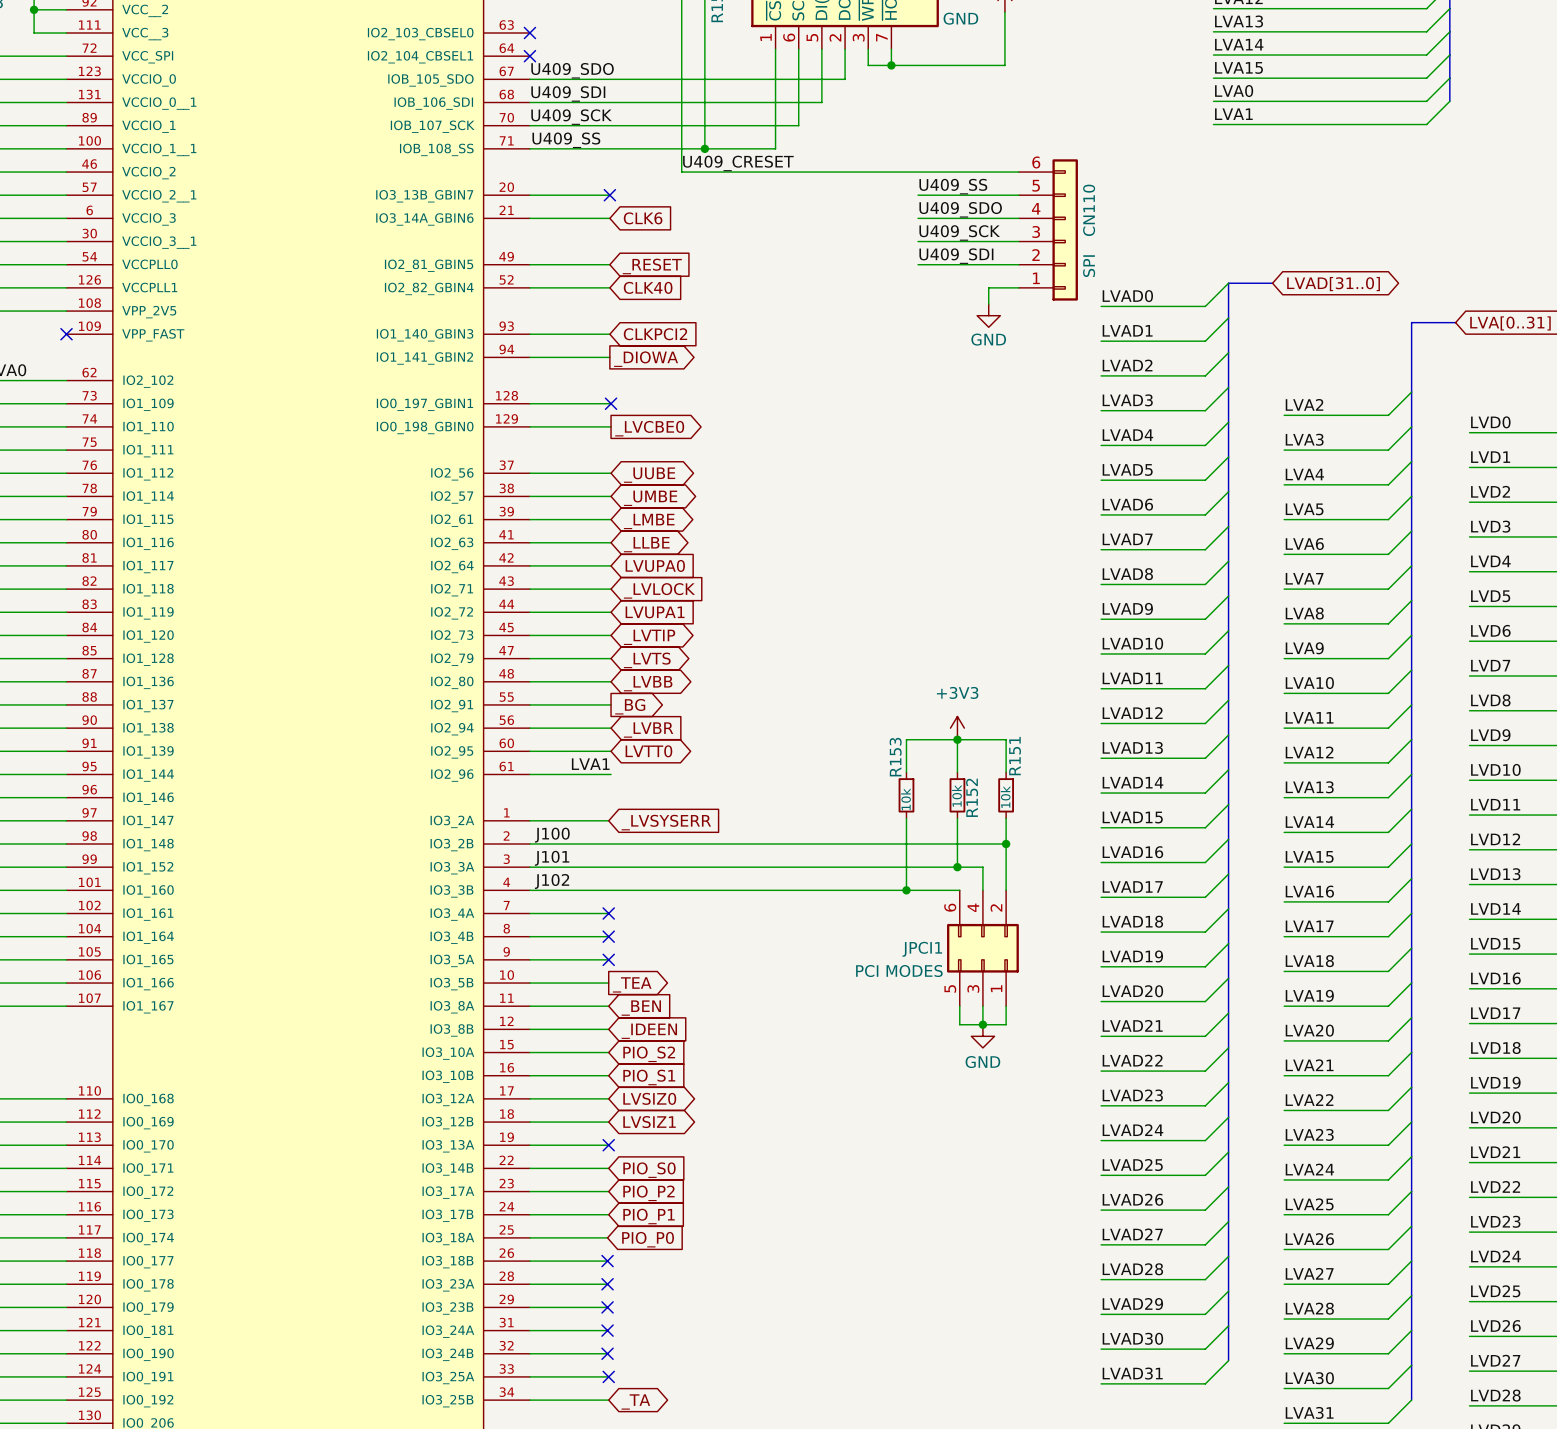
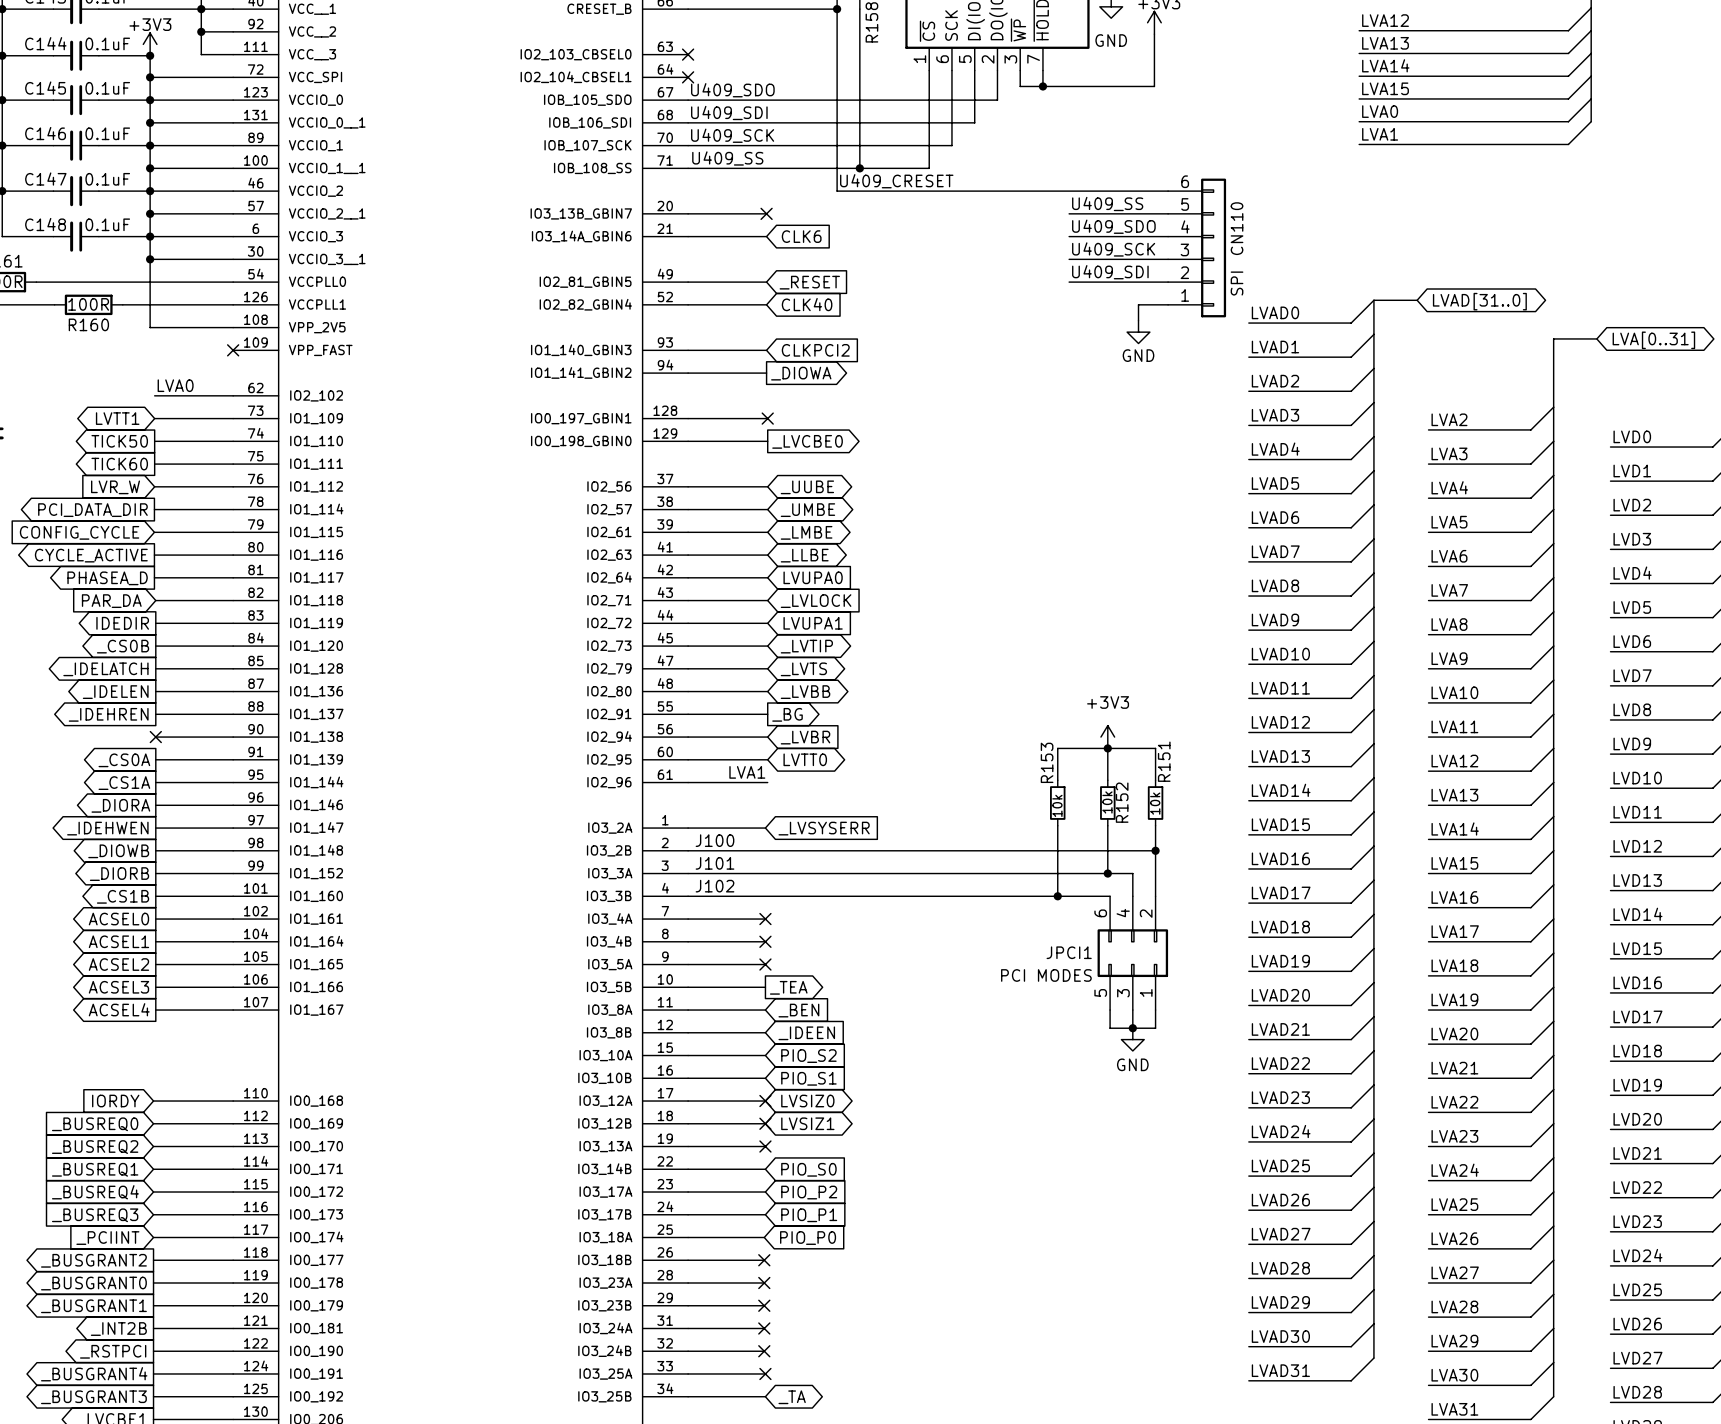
no-connect mark: none -> (765, 1101)
no-connect mark: none -> (765, 1123)

